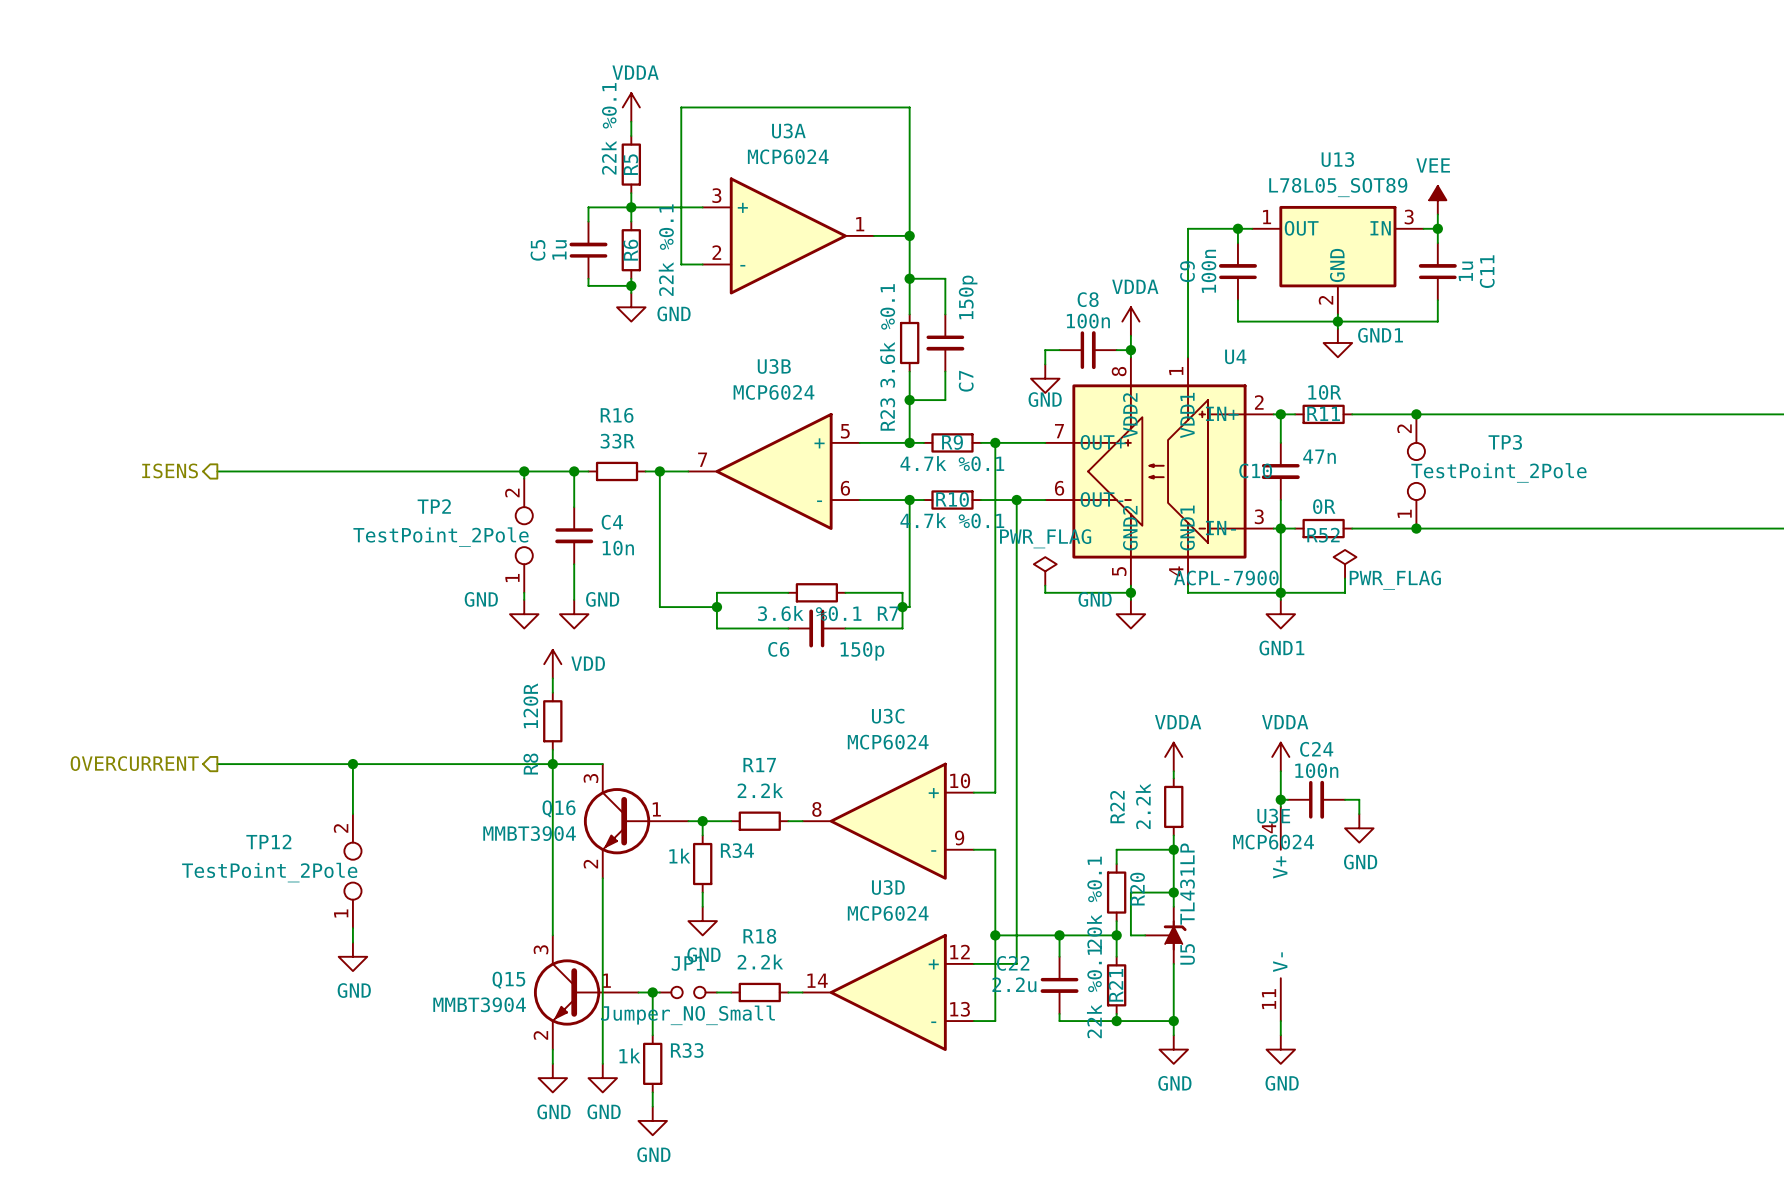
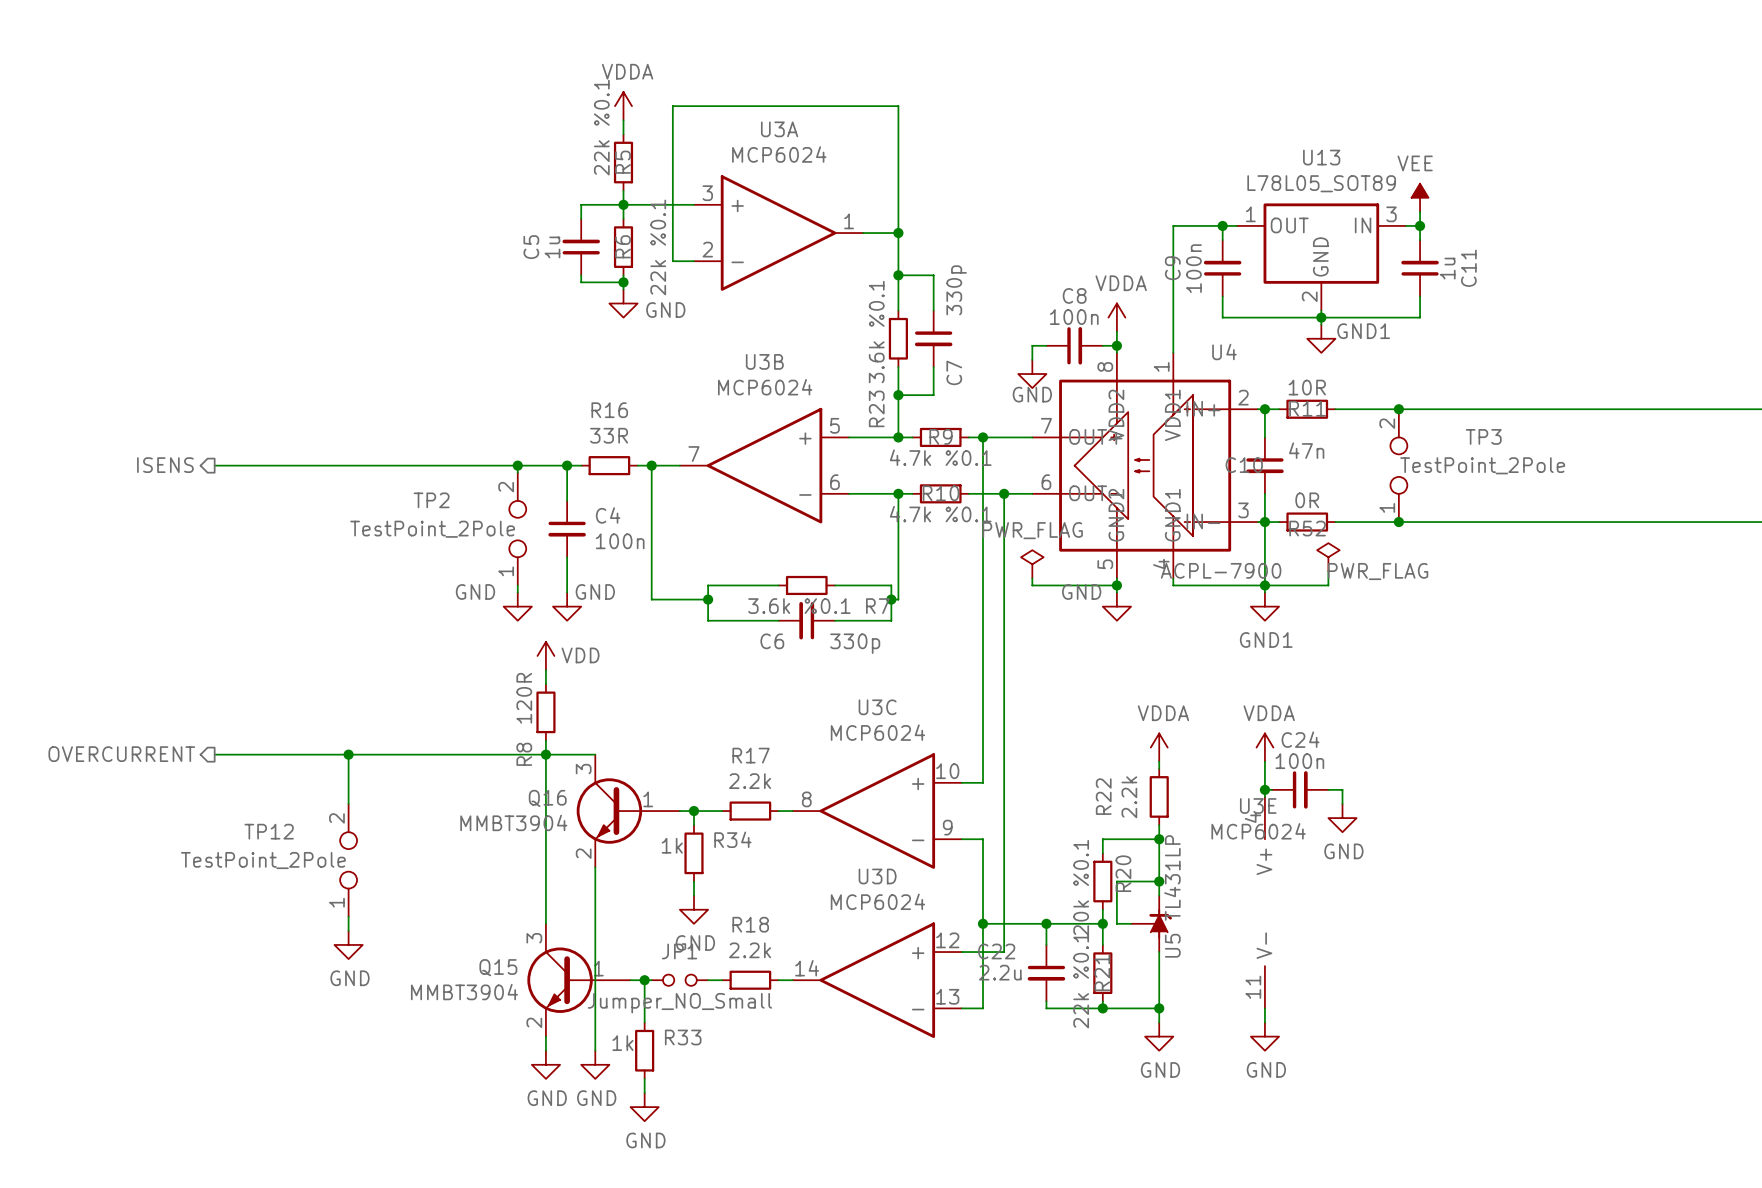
C7 value: 150p (968, 297) -> 330p (956, 290)
C4 value: 10n (618, 548) -> 100n (620, 541)
C6 value: 150p (862, 651) -> 330p (855, 643)

